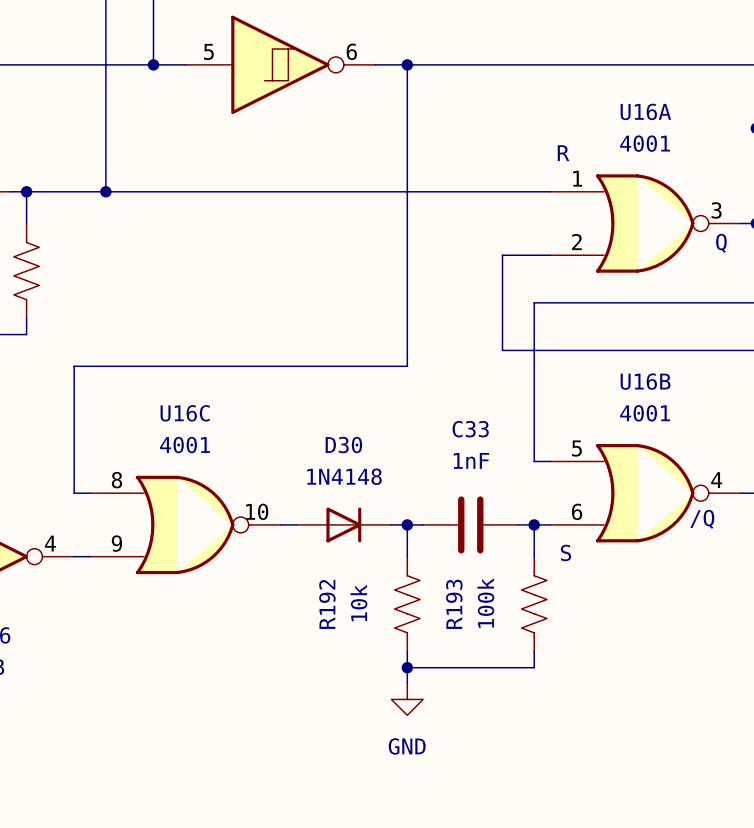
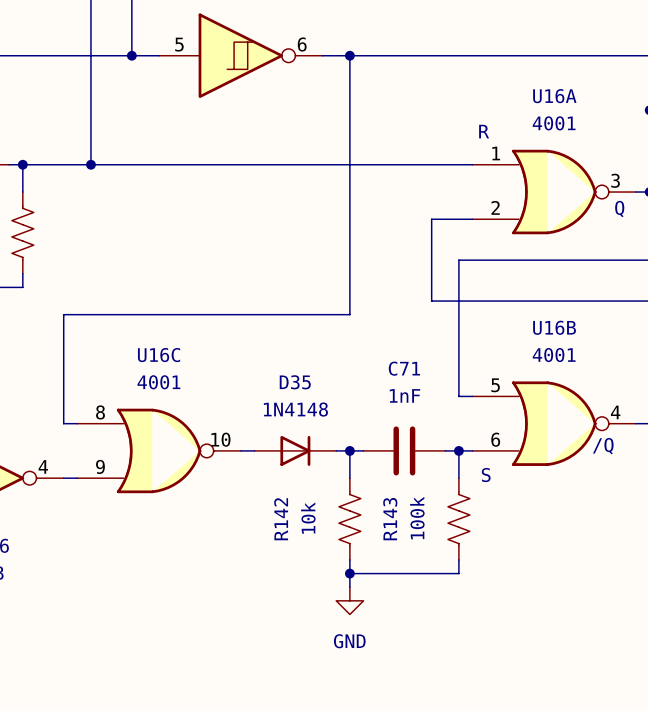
C33 name: C33 (470, 429) -> C71 (404, 368)
D30 name: D30 (343, 445) -> D35 (295, 382)
R192 name: R192 (327, 604) -> R142 (281, 519)
R193 name: R193 (454, 604) -> R143 (390, 519)

